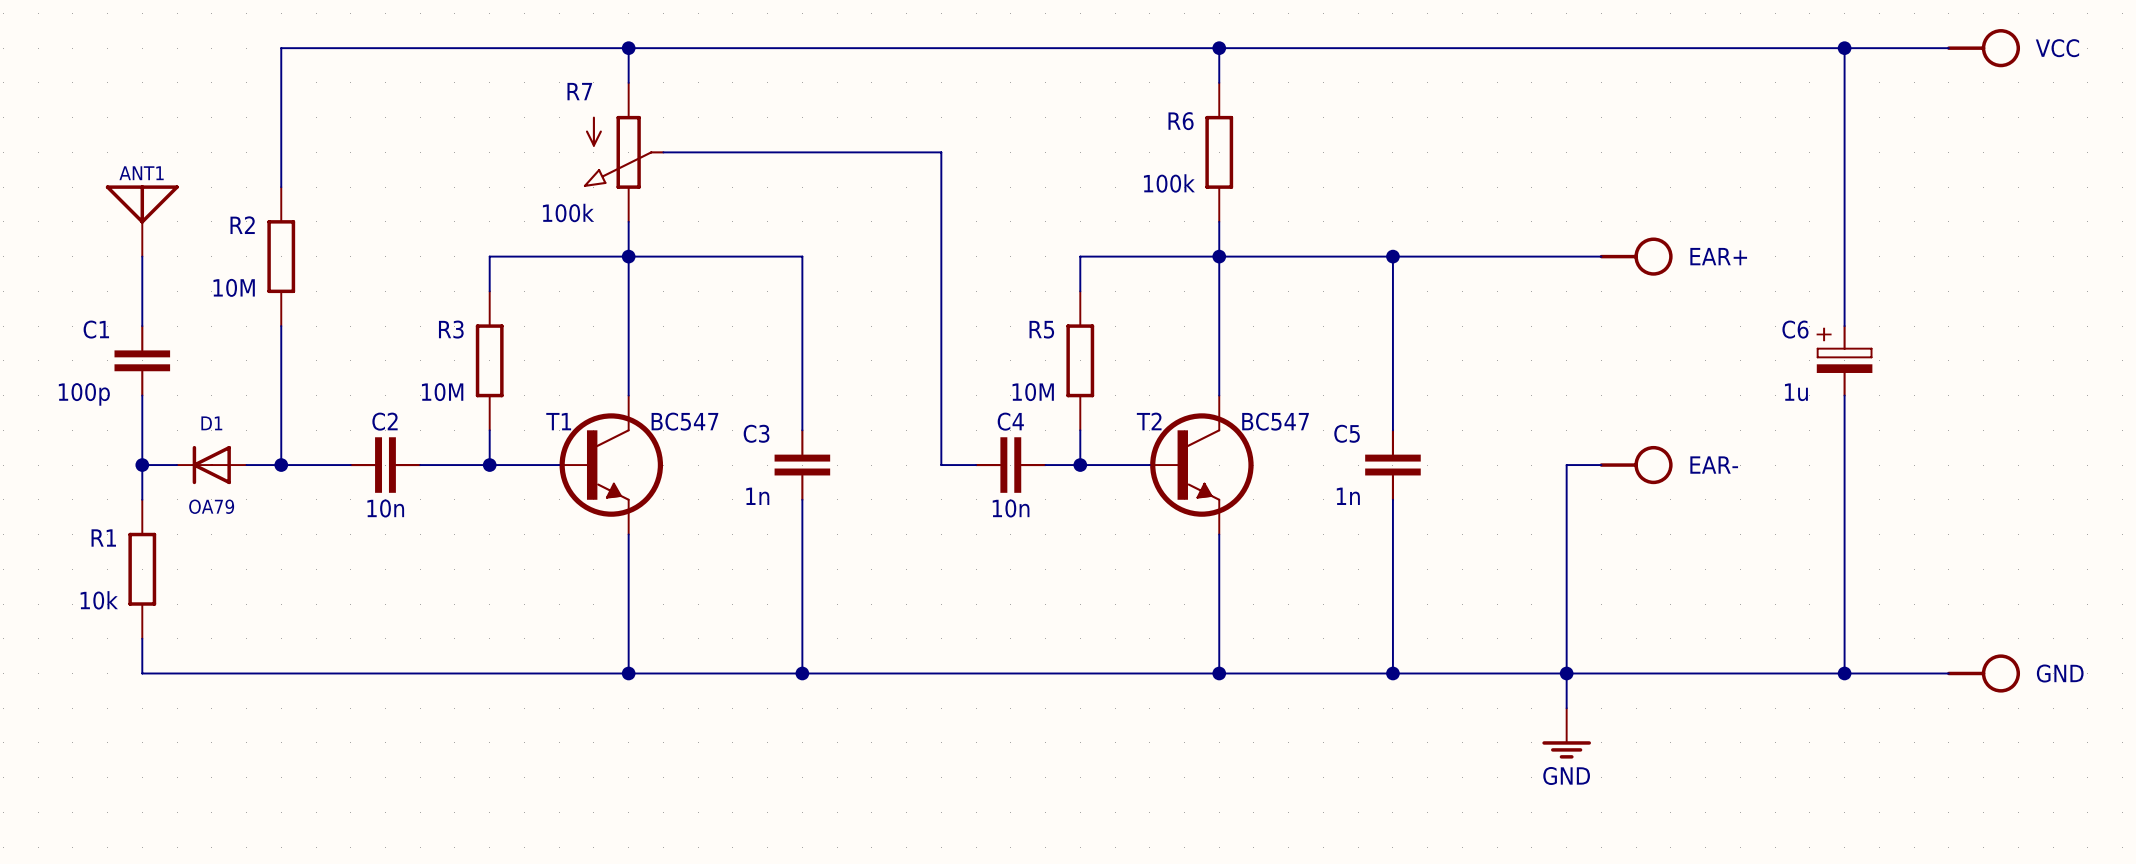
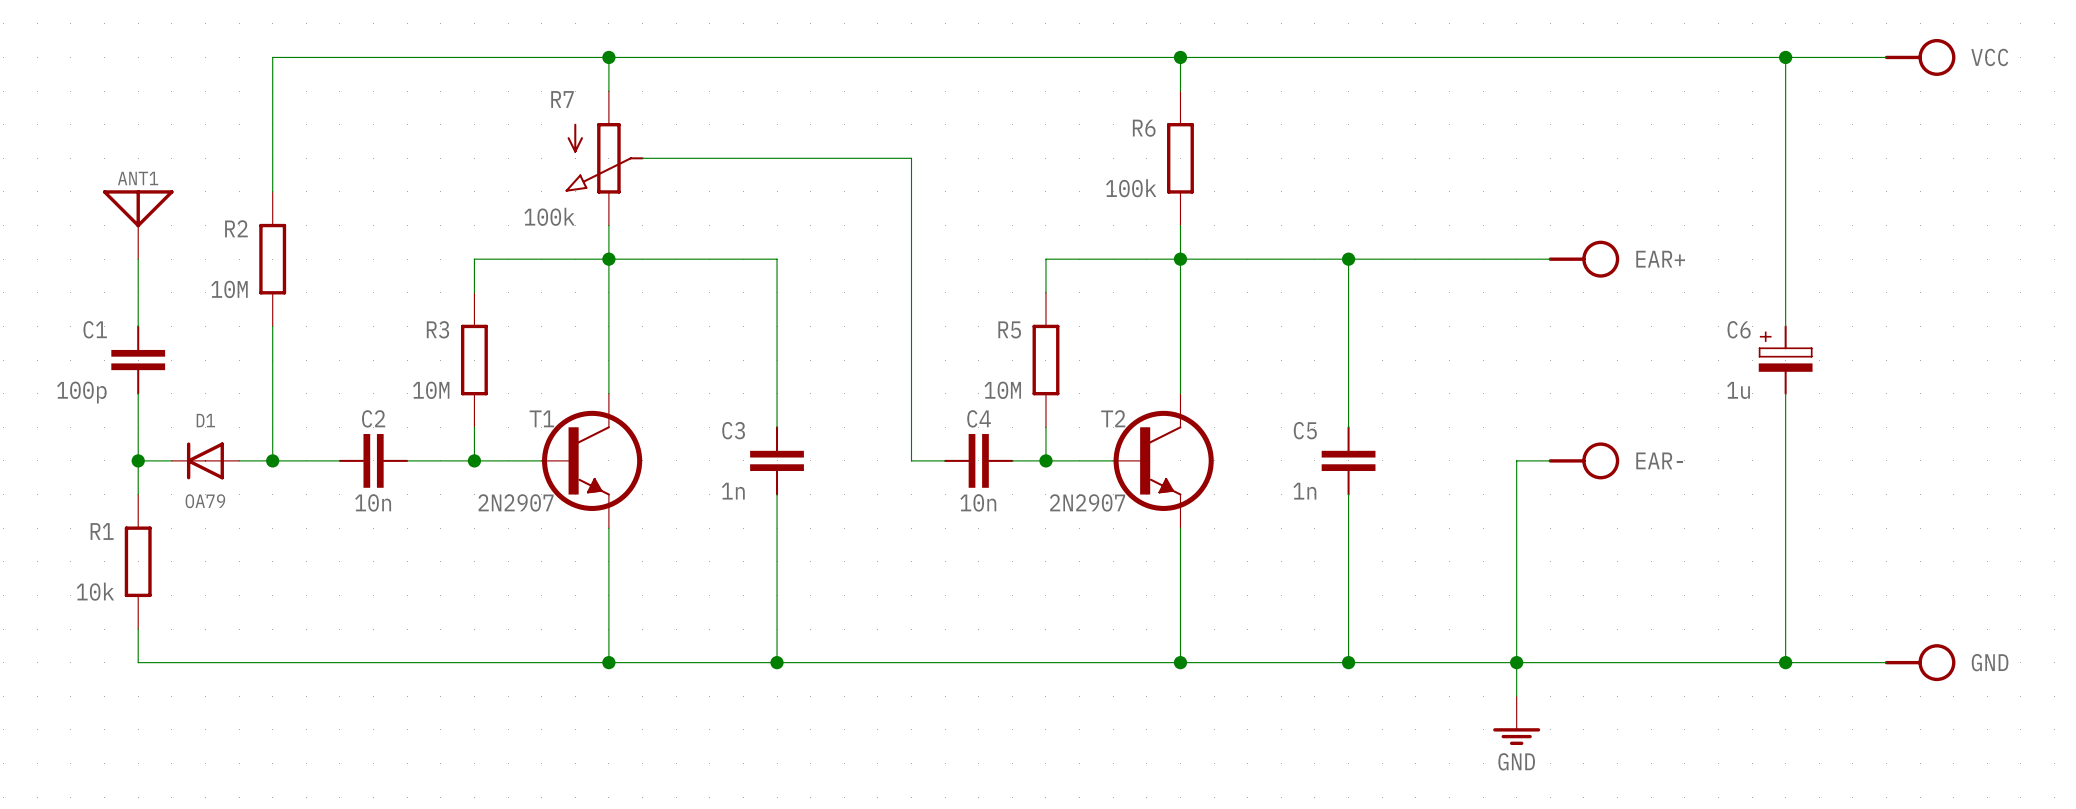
T1 value: BC547 (684, 421) -> 2N2907 (516, 502)
T2 value: BC547 (1275, 421) -> 2N2907 (1087, 502)

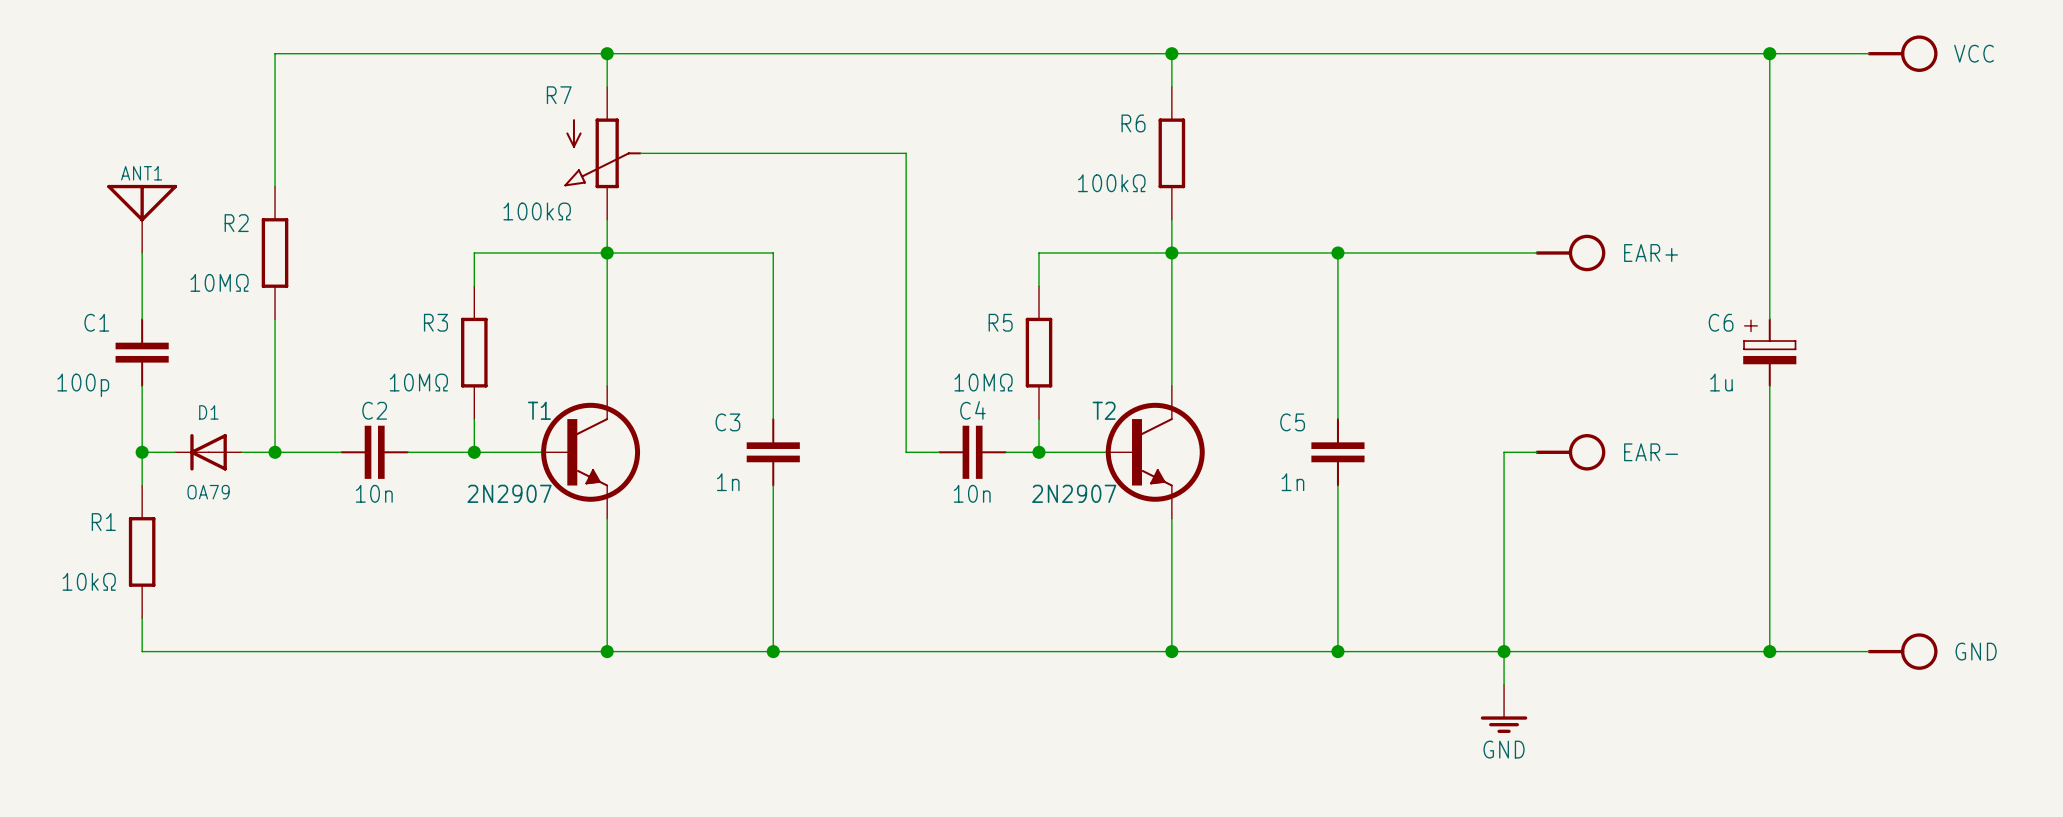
R6 value: 100k (1131, 188) -> 100kΩ (1111, 183)
R7 value: 100k (549, 216) -> 100kΩ (537, 211)
R2 value: 10M (229, 289) -> 10MΩ (219, 282)
R3 value: 10M (431, 390) -> 10MΩ (418, 382)
R5 value: 10M (1002, 390) -> 10MΩ (983, 382)
R1 value: 10k (95, 591) -> 10kΩ (89, 581)

